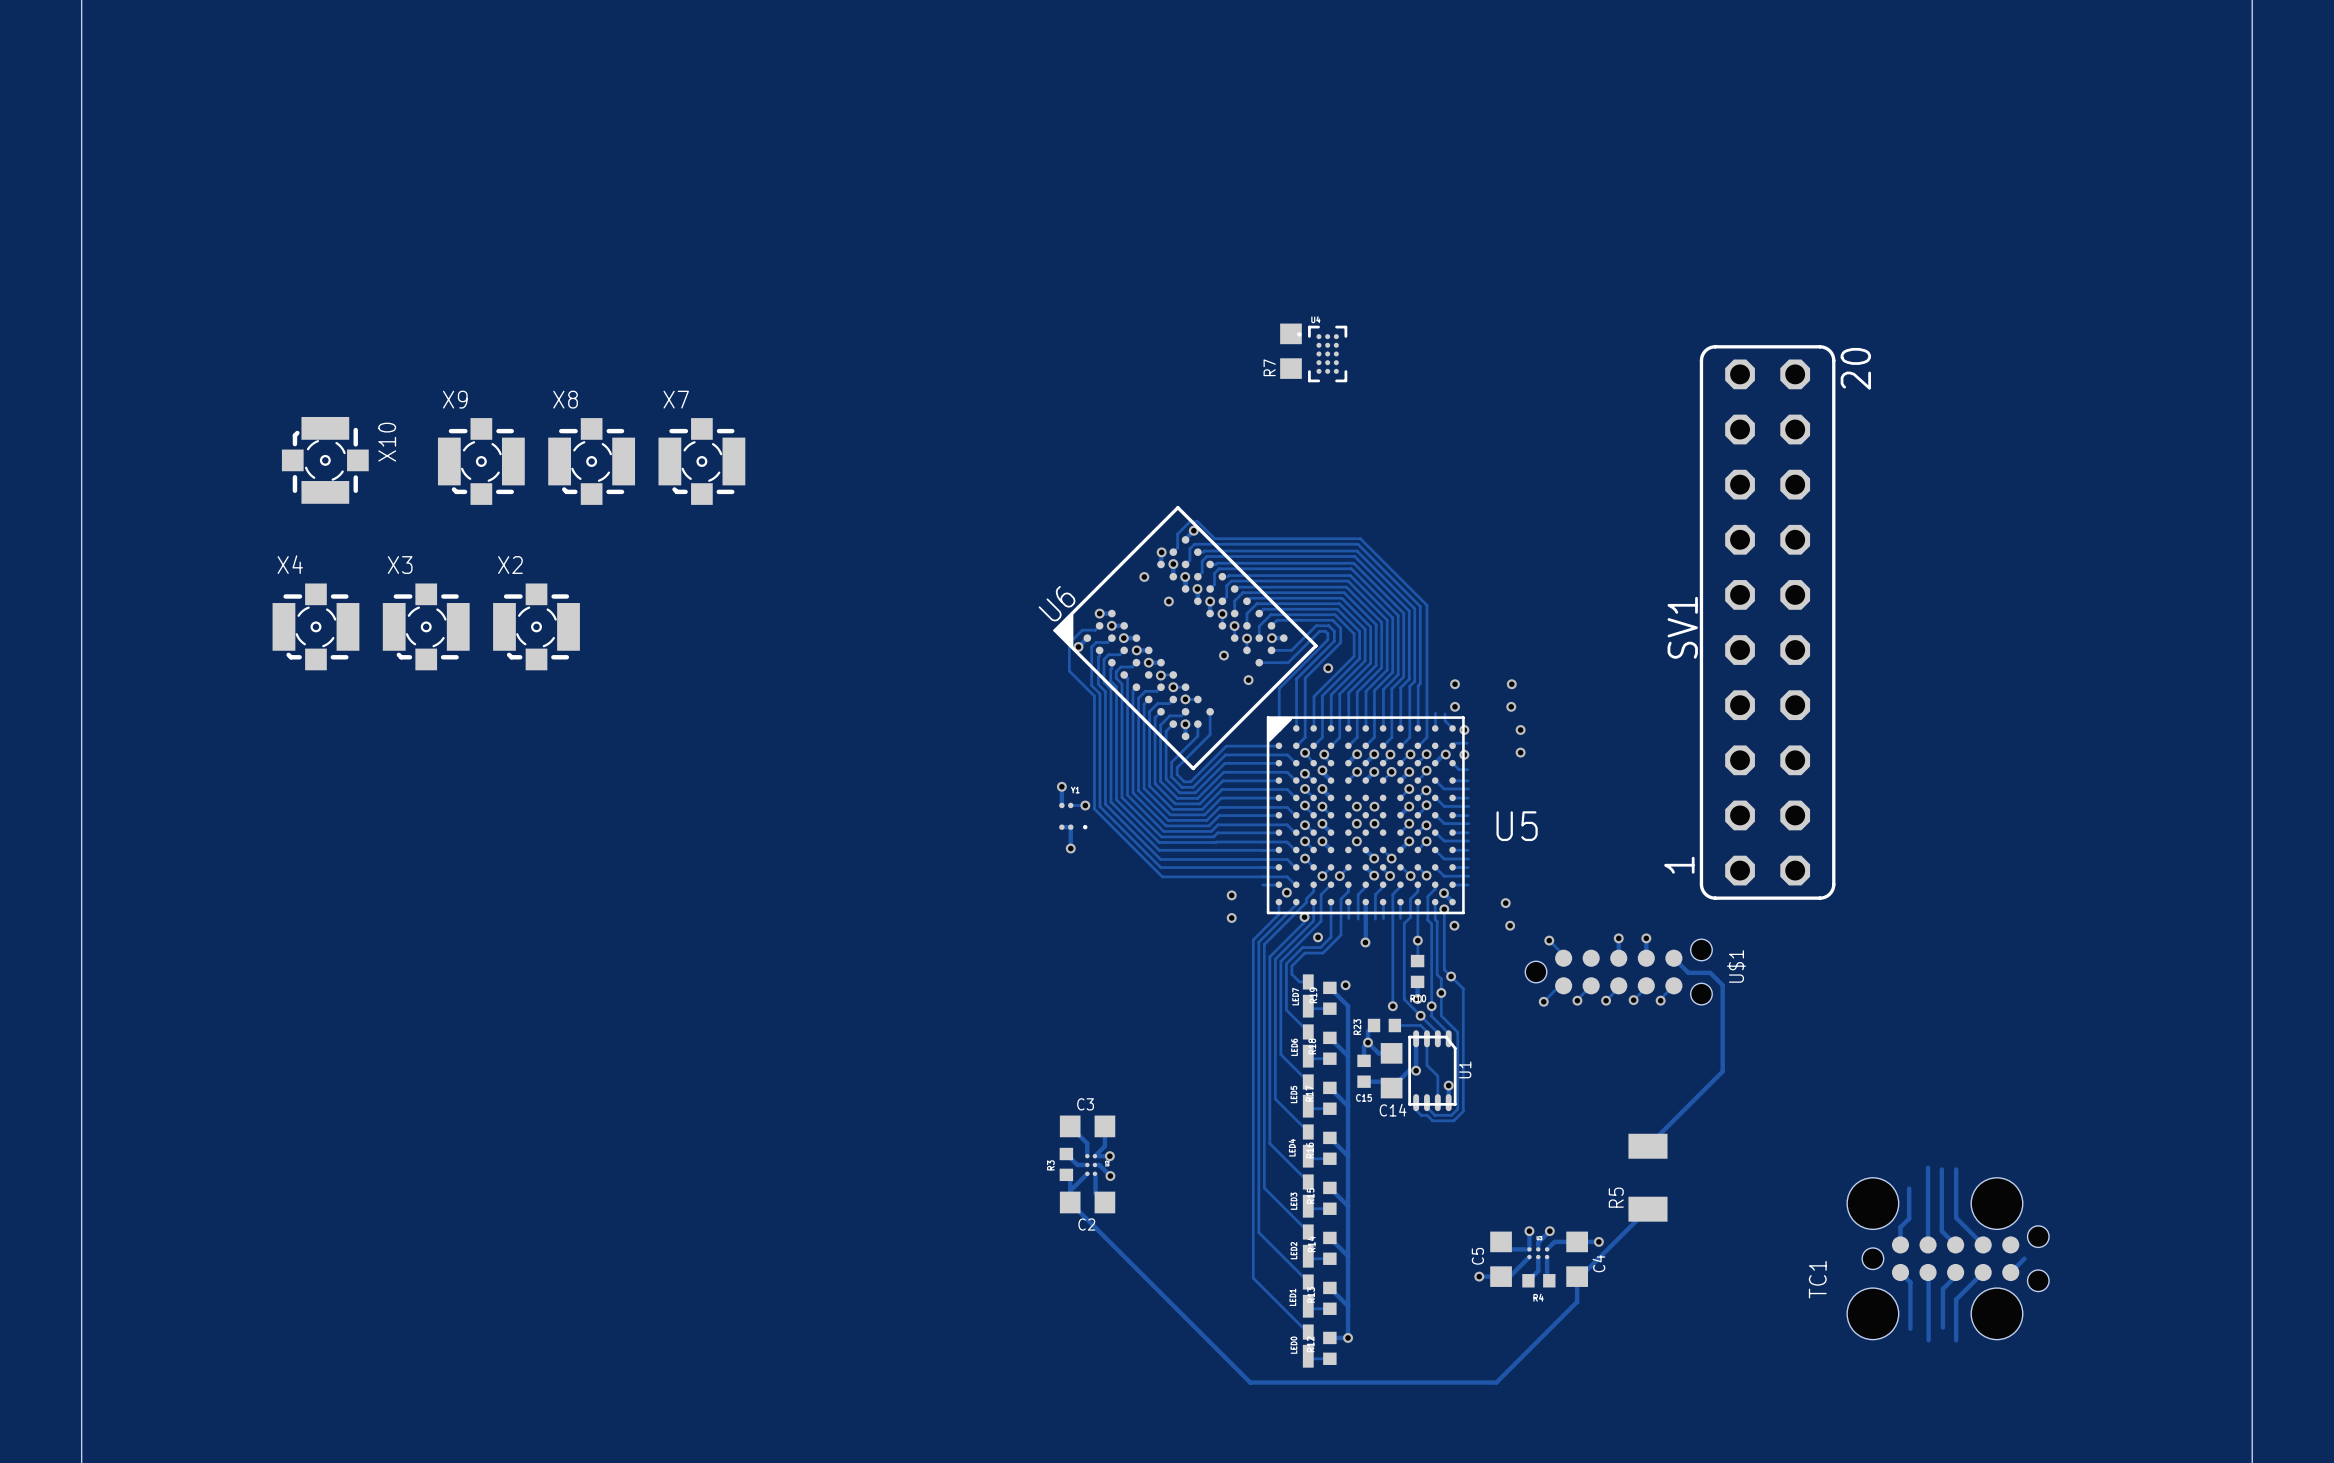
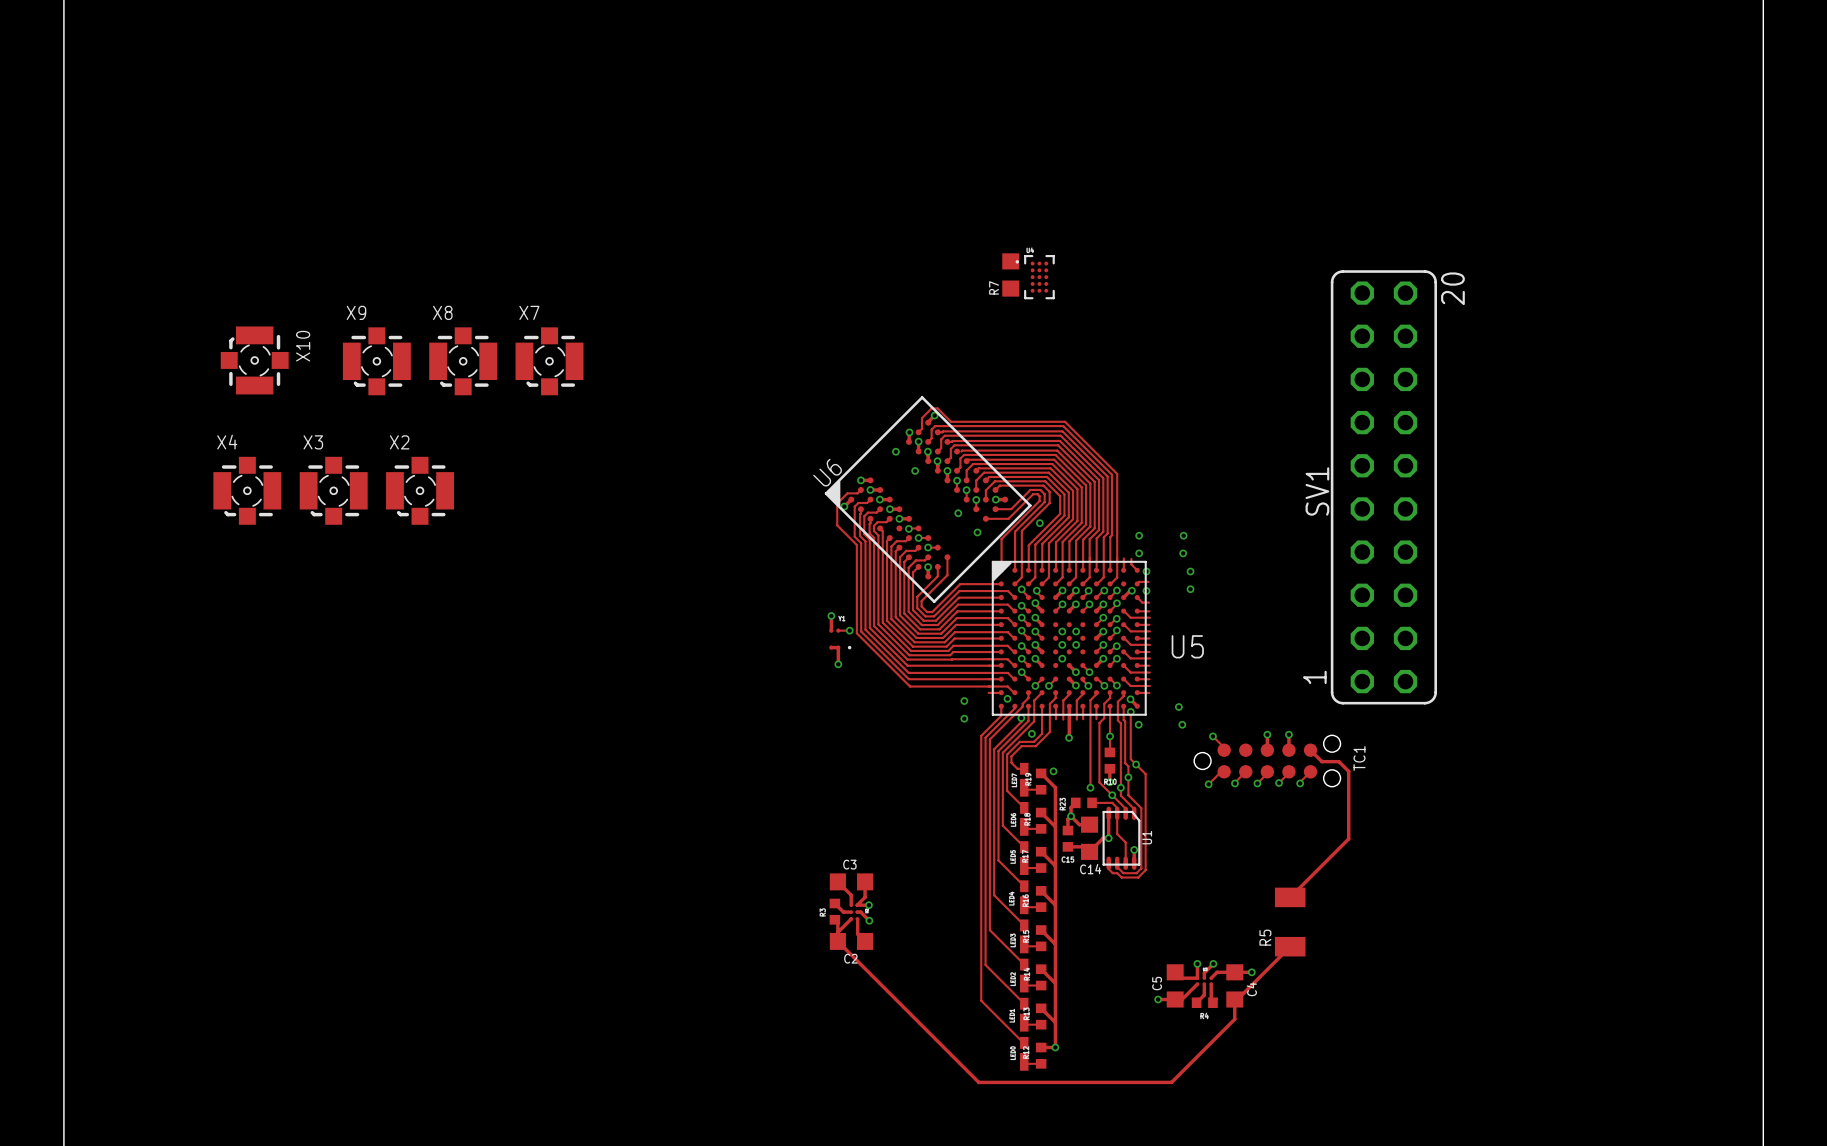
U$1 name: U$1 (1736, 966) -> TC1 (1359, 758)
track: (1928, 1167) (1928, 1244) -> none
track: (1941, 1169) (1941, 1231) (1955, 1244) -> none
track: (1956, 1169) (1956, 1217) (1983, 1244) -> none
track: (1909, 1188) (1909, 1218) (1900, 1227) (1900, 1244) -> none
TC1: (1948, 1258) -> none
track: (2024, 1258) (2010, 1272) (2016, 1272) -> none
track: (1900, 1272) (1910, 1282) (1910, 1328) -> none
track: (1928, 1272) (1928, 1340) -> none
track: (1955, 1272) (1955, 1276) (1942, 1289) (1942, 1327) -> none
track: (1983, 1272) (1956, 1299) (1956, 1340) -> none

